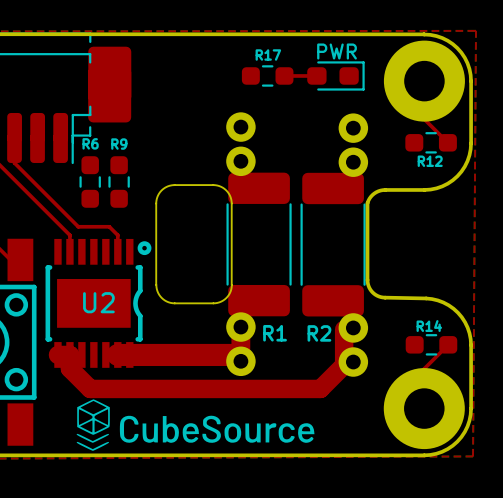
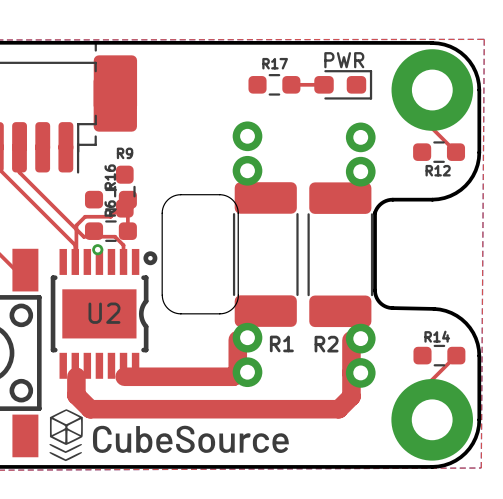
R6 rotation: 0° (90, 181) -> 90° clockwise (110, 231)
R6 position: (90, 181) -> (110, 231)
R16: none -> (110, 199)
top track: none -> (127, 231) (127, 199) (110, 216) (85, 216) (76, 225) (76, 272)
via: none -> (97, 249)
top track: none -> (237, 339) (237, 372) (233, 376) (124, 376)
top track: (240, 329) (240, 361) (234, 354) (117, 354) -> none
top track: (57, 354) (69, 354) (69, 368) (90, 388) (320, 388) (344, 365) -> (76, 376) (76, 395) (90, 409) (338, 409) (351, 396) (351, 376)
drawing position: (195, 425) -> (169, 435)

